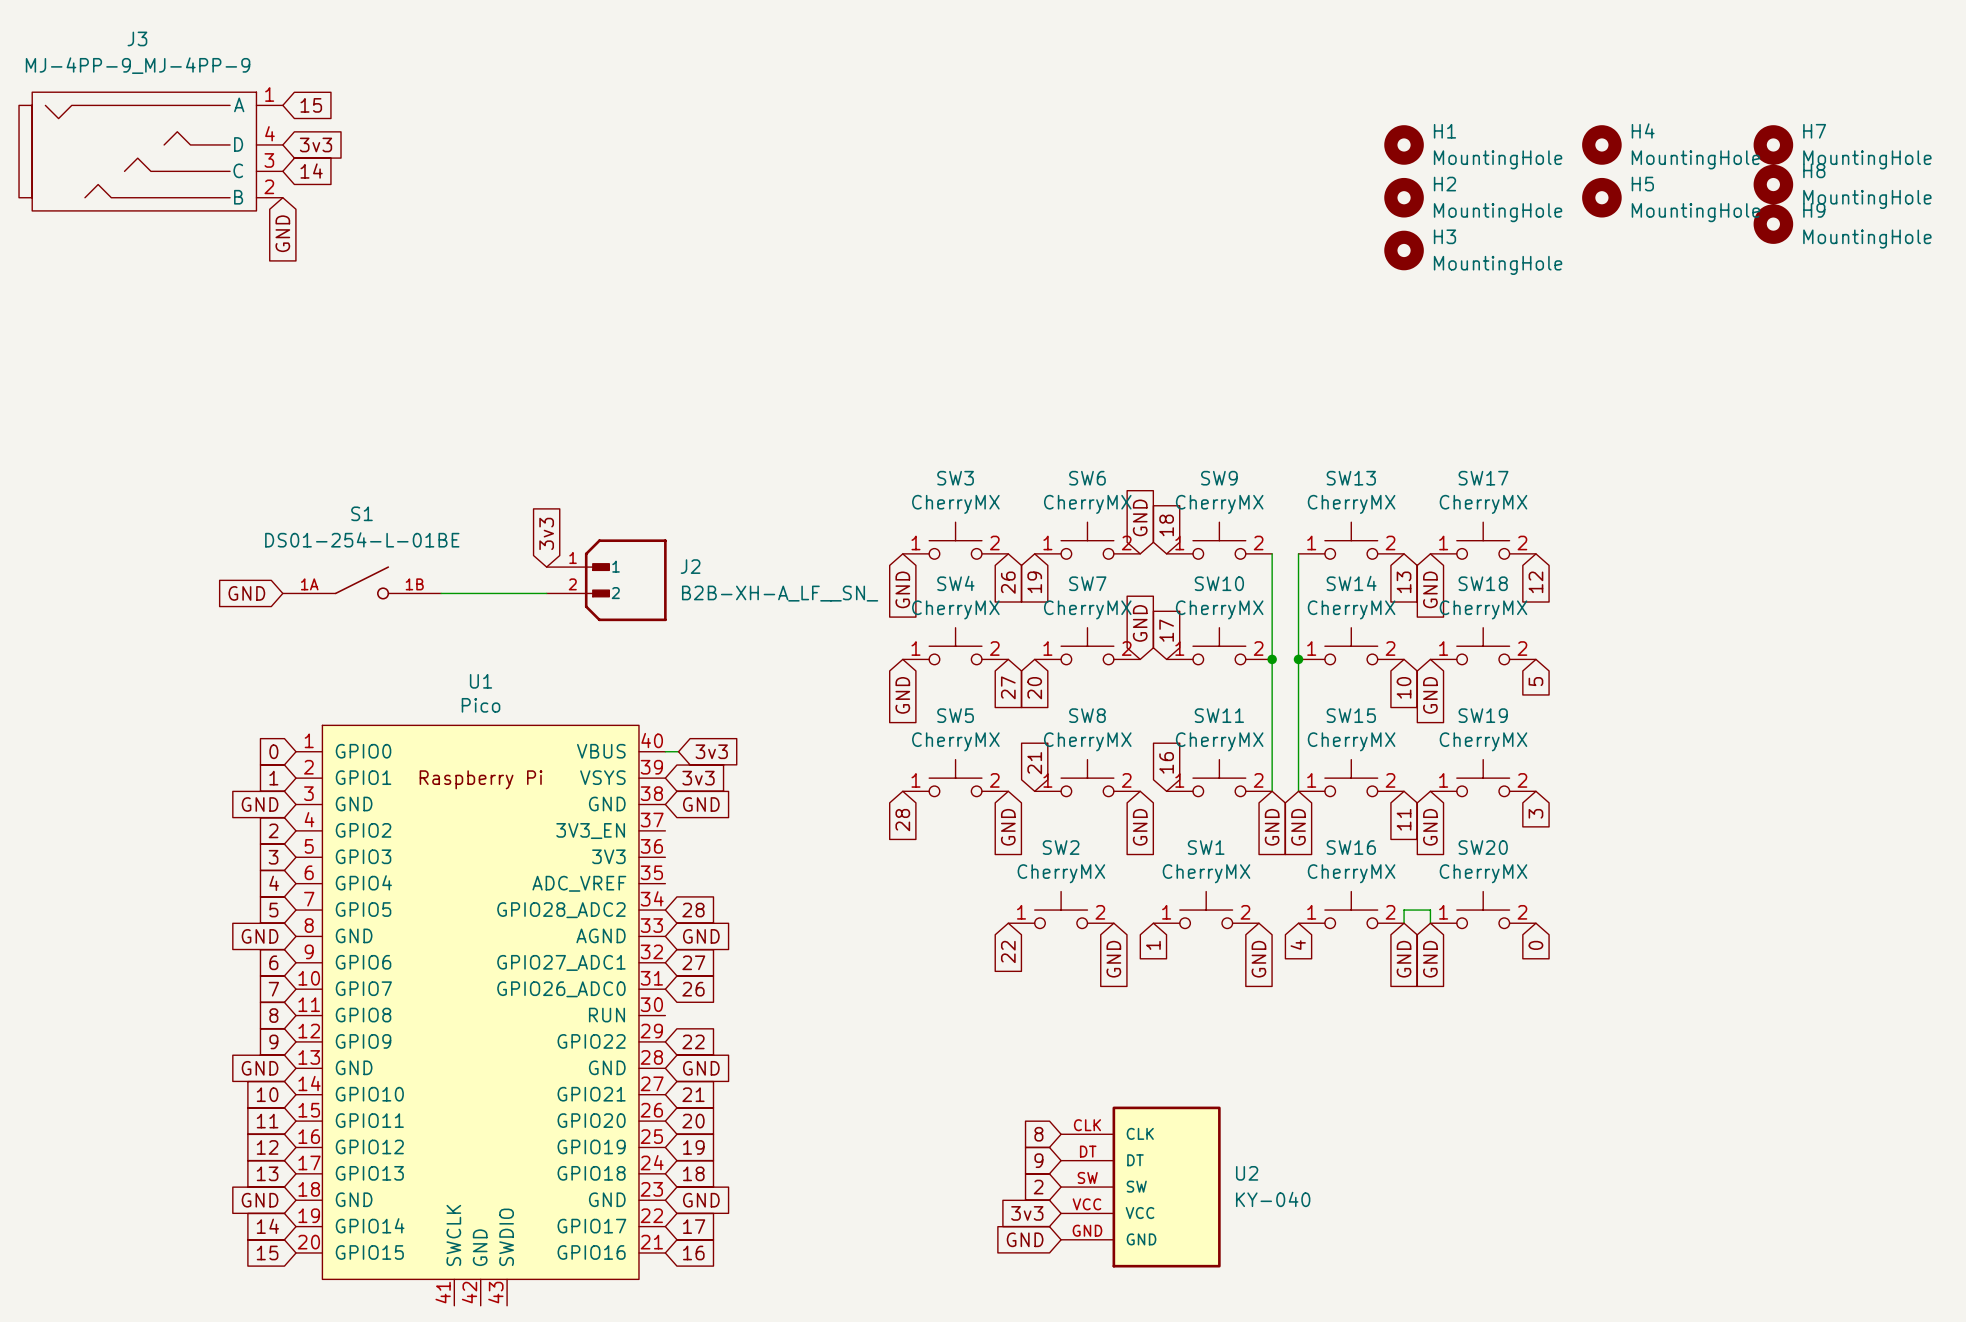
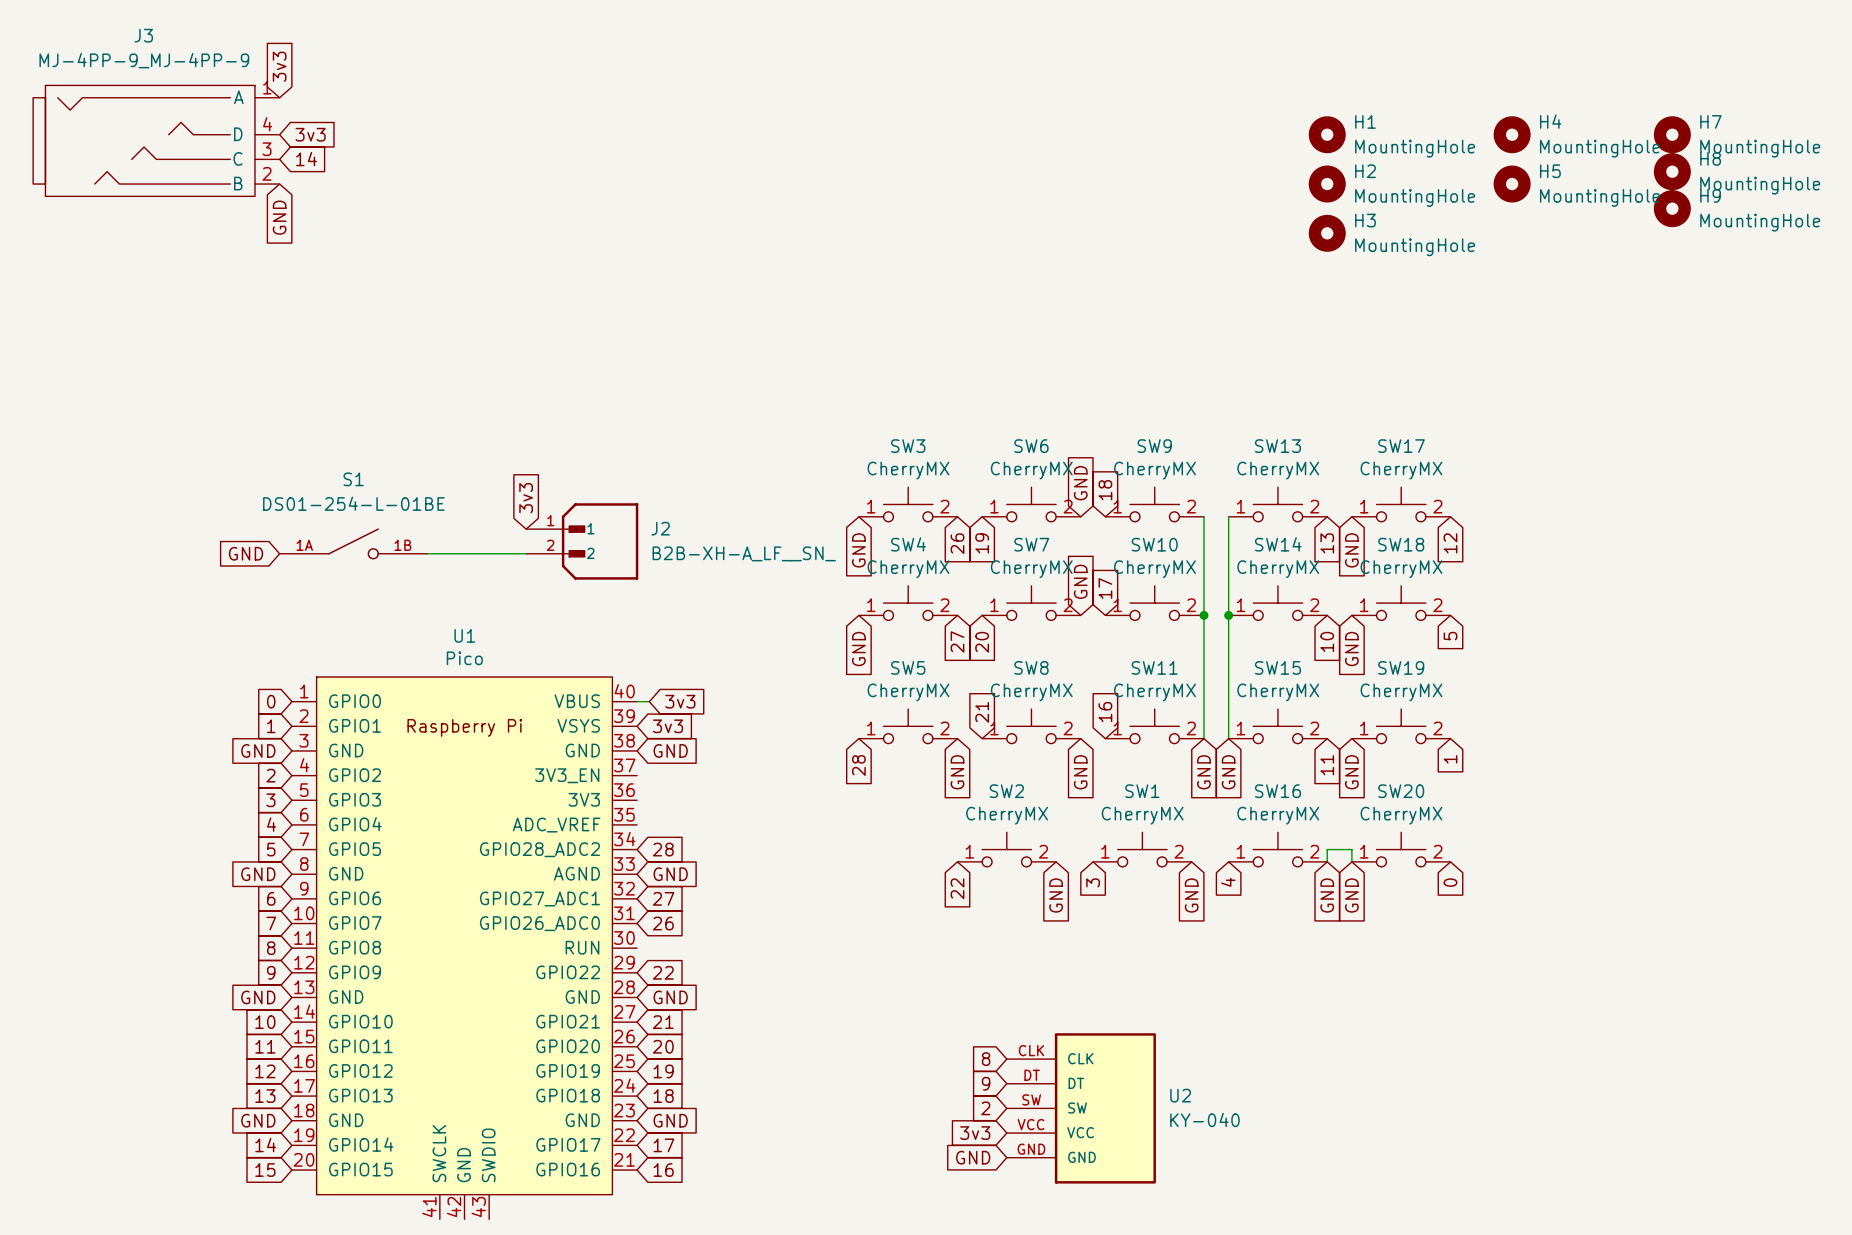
global label: 15 (311, 105) -> 3v3 (279, 66)
global label: 3 (1535, 813) -> 1 (1450, 759)
global label: 1 (1153, 945) -> 3 (1093, 882)

